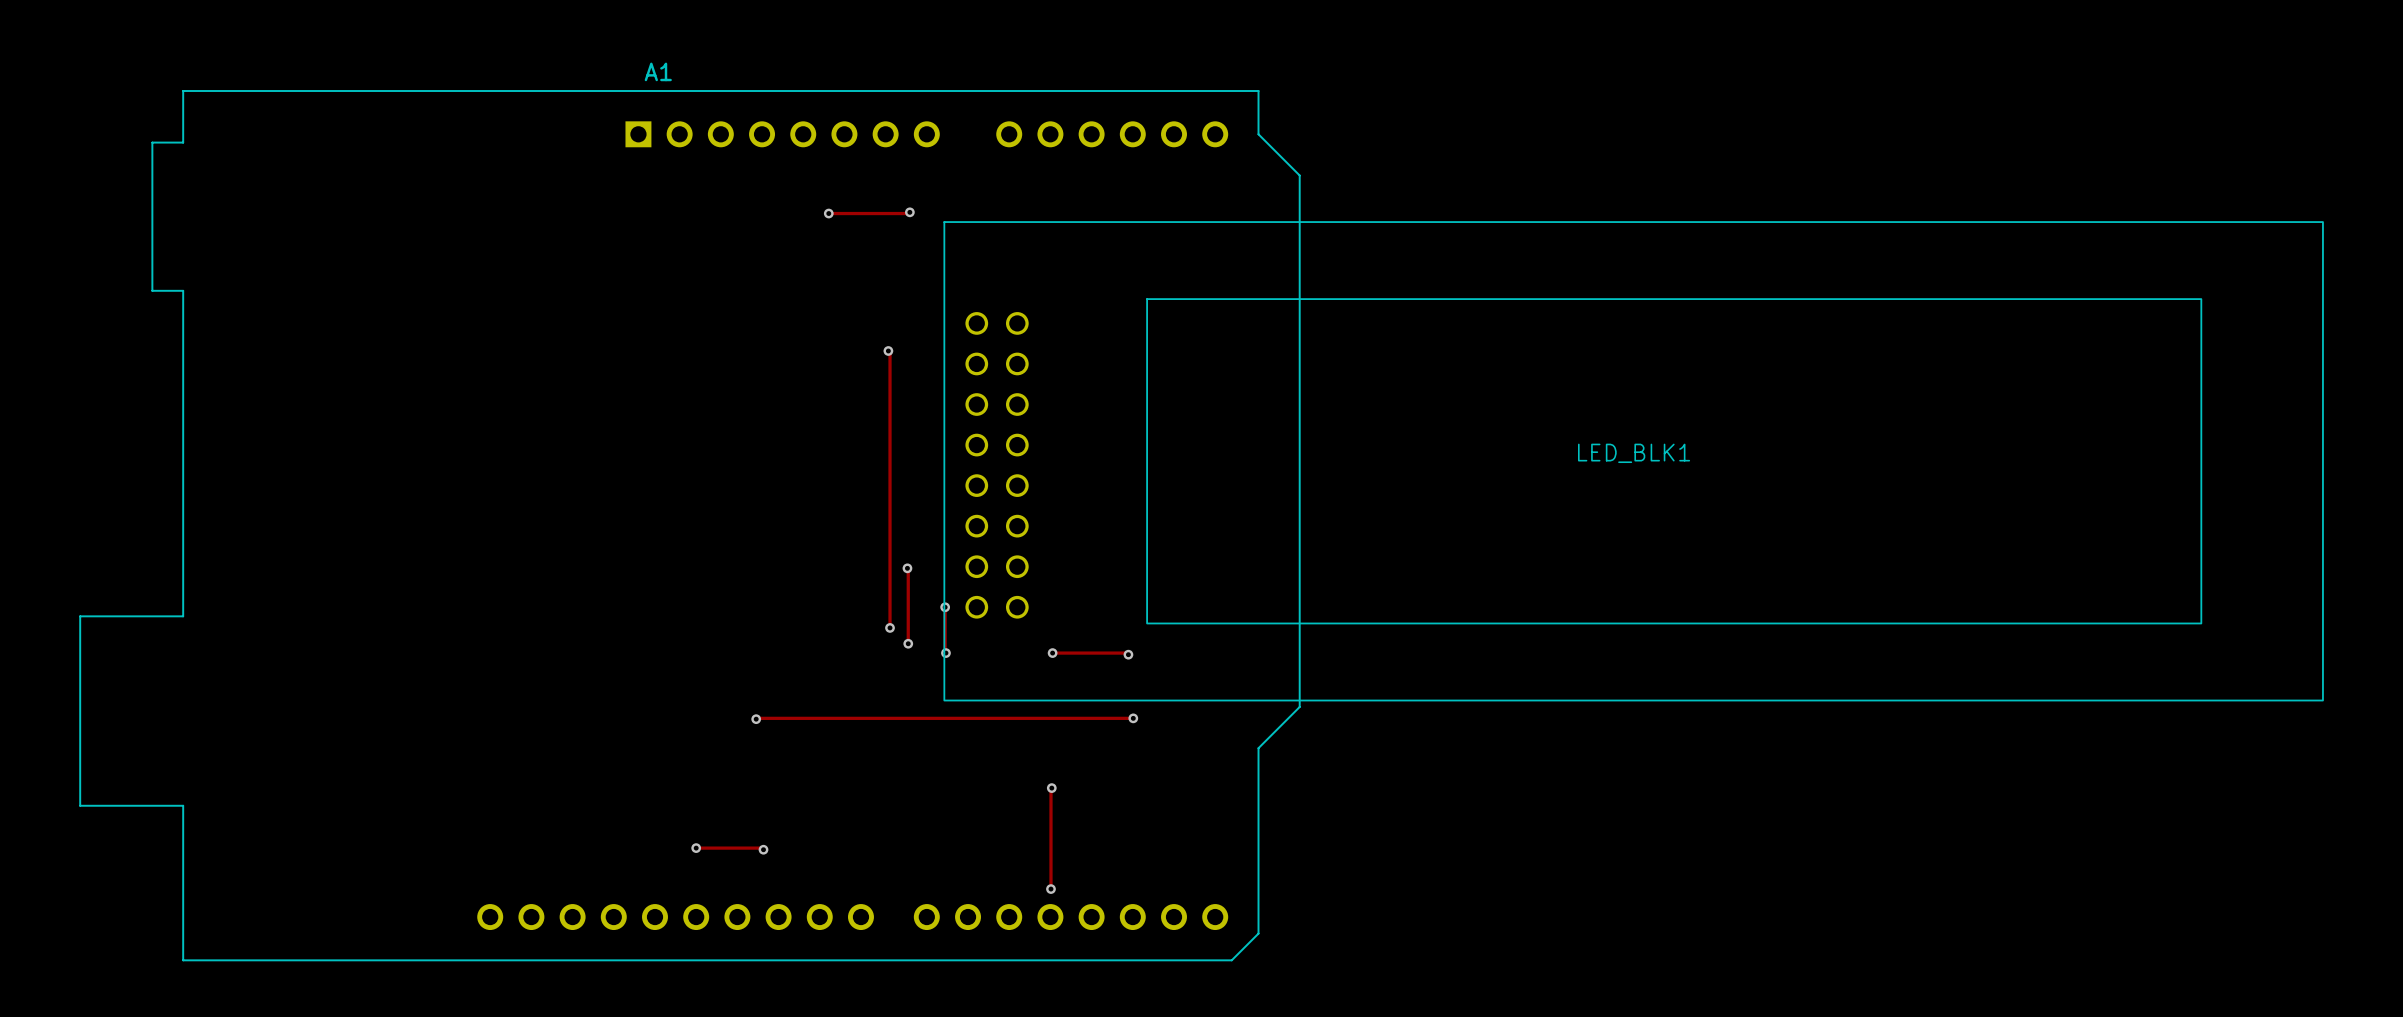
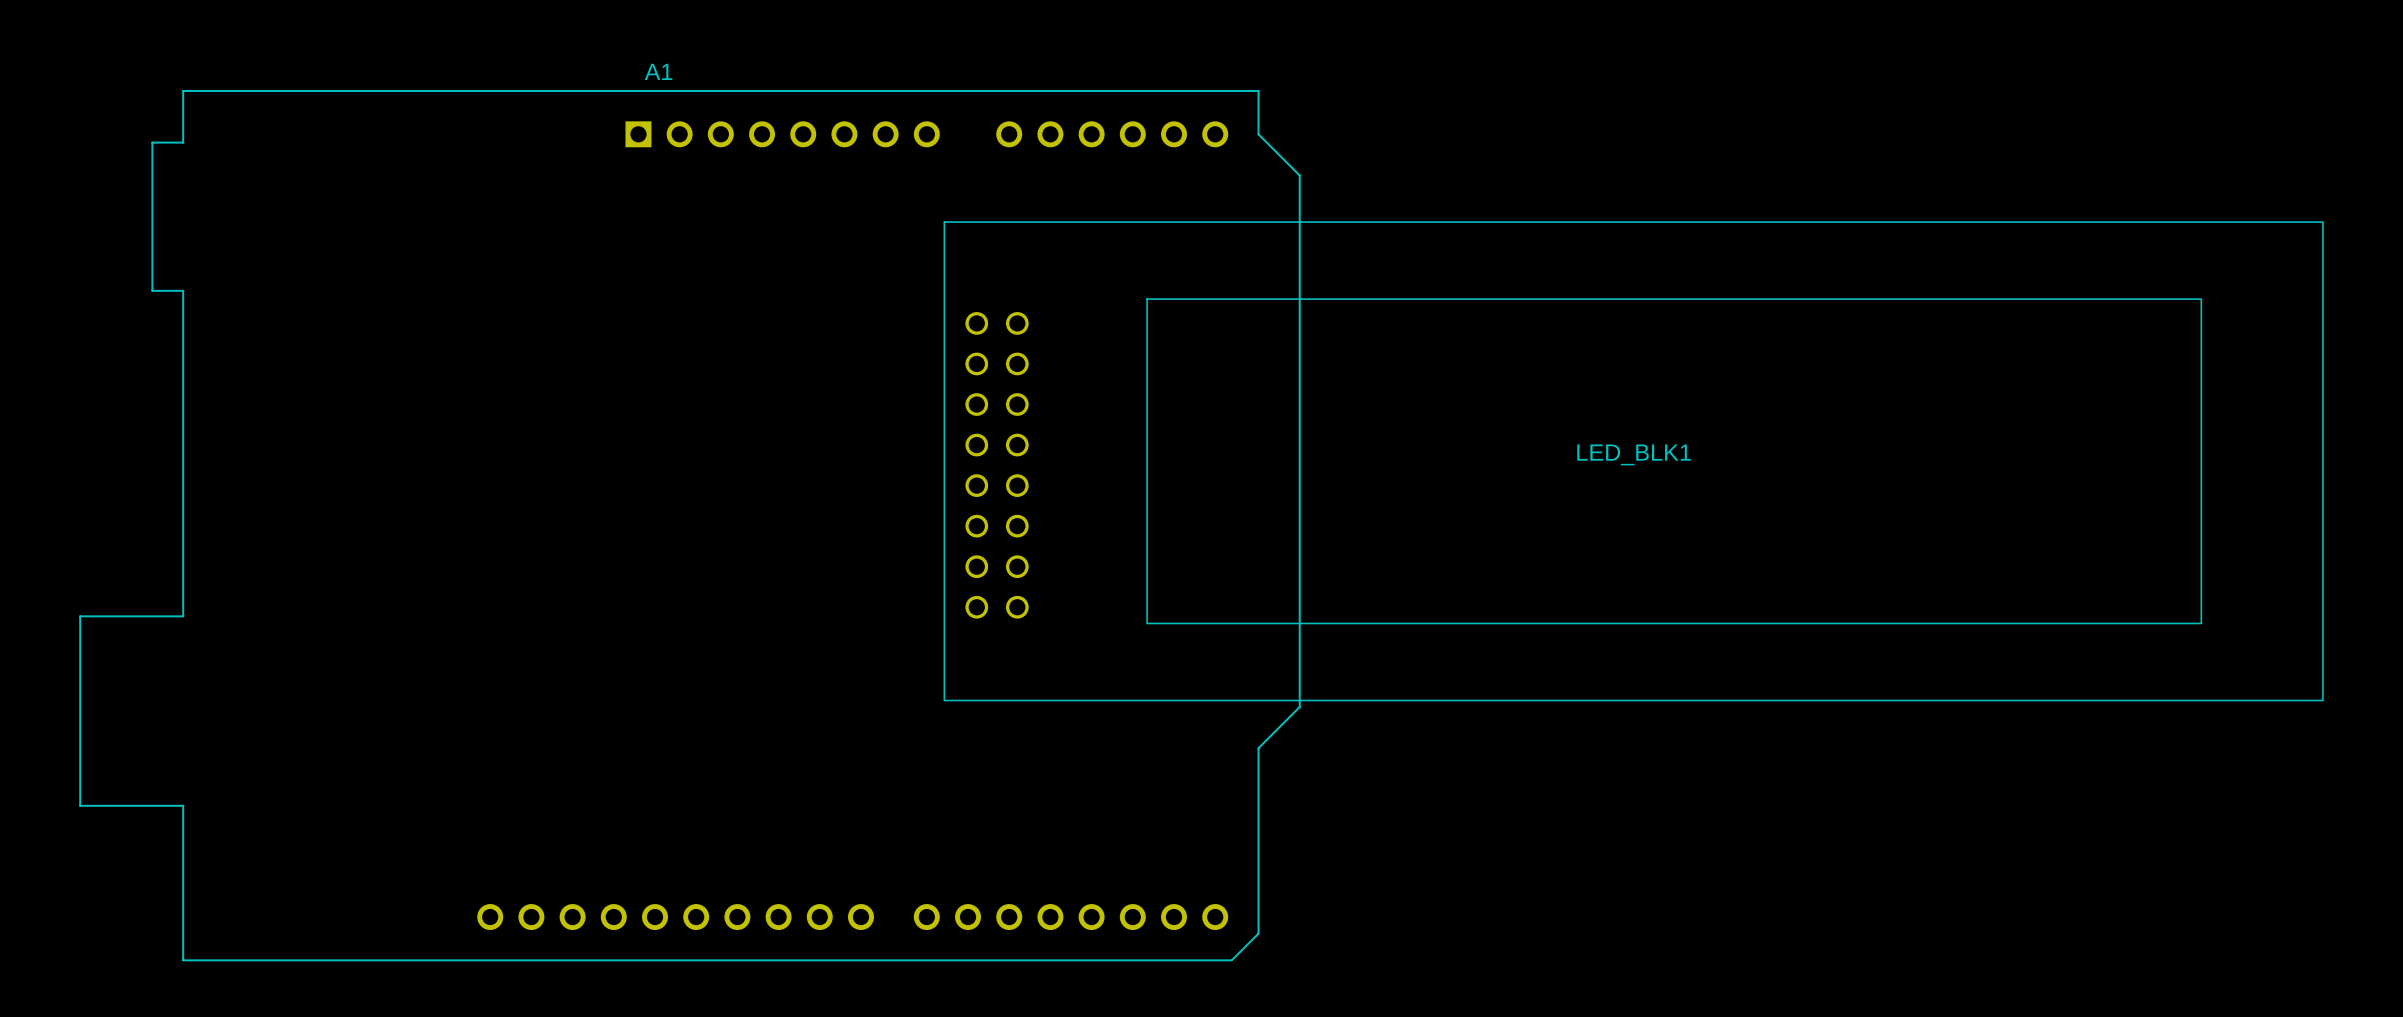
track: (909, 212) (828, 213) -> none
via: (909, 212) -> none
via: (828, 213) -> none
track: (888, 350) (890, 352) (890, 627) -> none
via: (888, 350) -> none
track: (907, 568) (908, 643) -> none
via: (907, 568) -> none
track: (945, 607) (945, 653) -> none
via: (945, 607) -> none
via: (890, 627) -> none
via: (908, 643) -> none
via: (945, 653) -> none
track: (1052, 653) (1126, 653) (1128, 654) -> none
via: (1052, 653) -> none
via: (1128, 654) -> none
track: (1133, 718) (756, 719) -> none
via: (1133, 718) -> none
via: (756, 719) -> none
track: (1051, 788) (1050, 889) -> none
via: (1051, 788) -> none
track: (696, 848) (761, 848) (763, 849) -> none
via: (696, 848) -> none
via: (763, 849) -> none
via: (1050, 889) -> none

